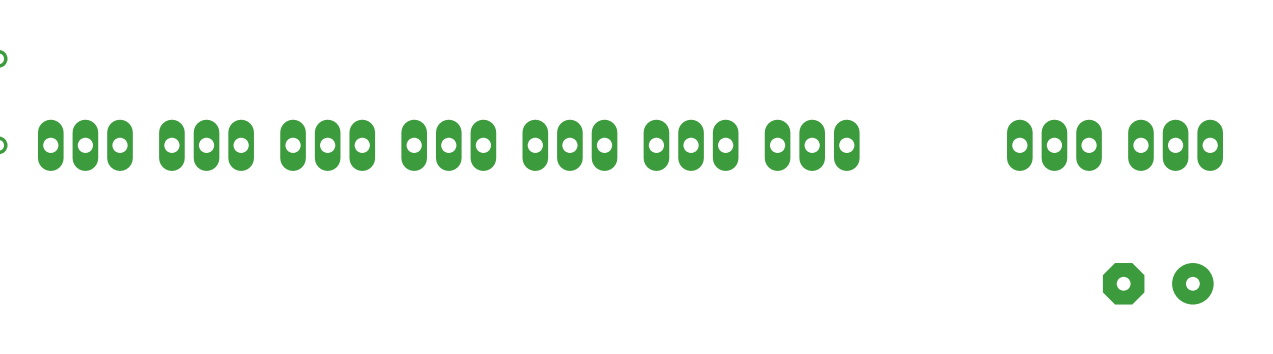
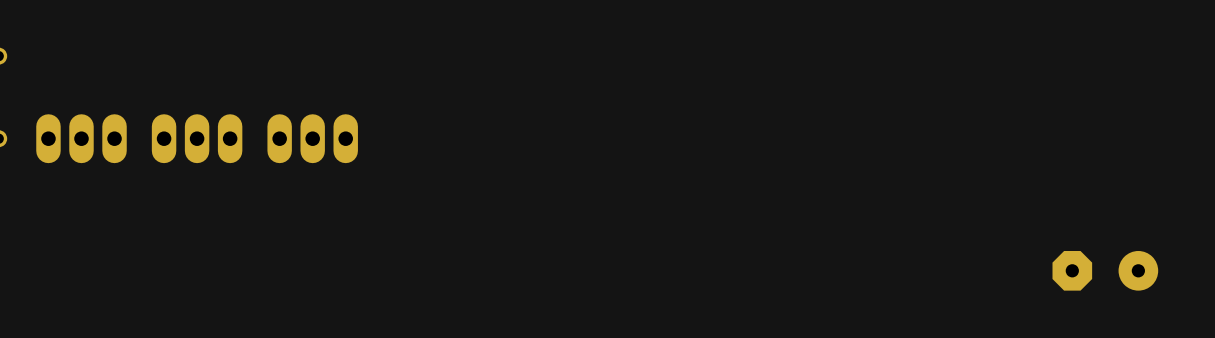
part: (448, 145) -> none
part: (569, 145) -> none
part: (691, 145) -> none
part: (812, 145) -> none
part: (1054, 145) -> none
part: (1175, 145) -> none

